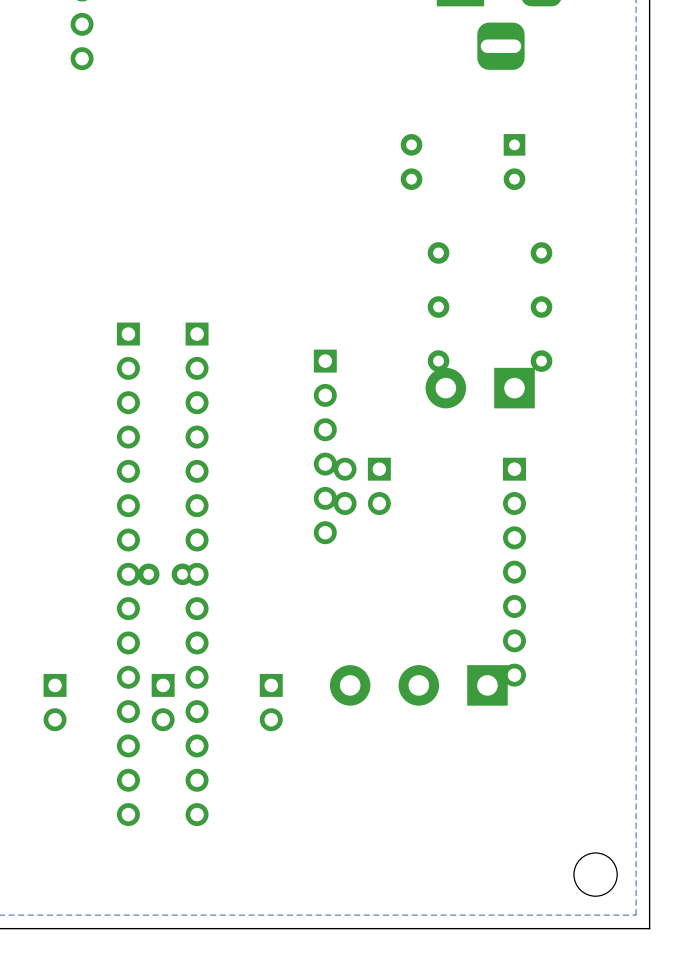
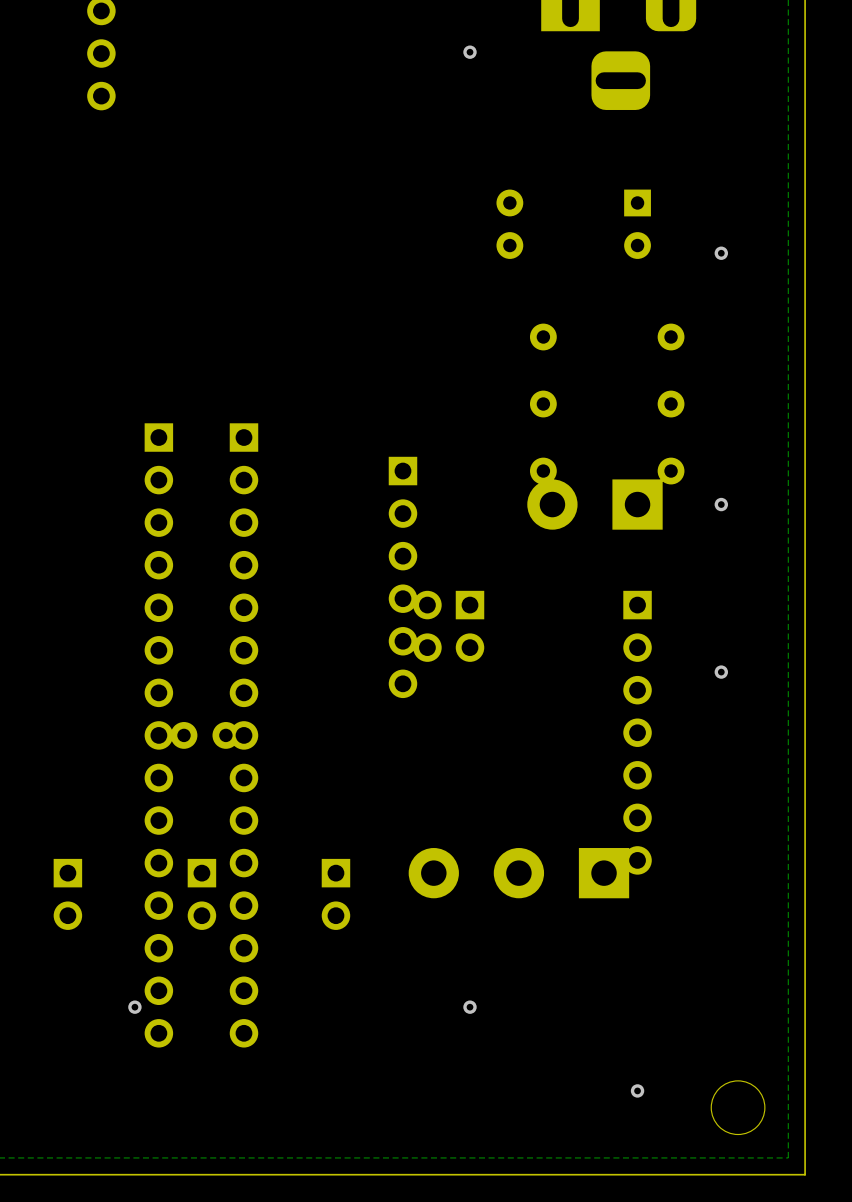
via: none -> (470, 52)
via: none -> (721, 253)
via: none -> (721, 504)
via: none -> (721, 672)
via: none -> (134, 1007)
via: none -> (470, 1007)
via: none -> (637, 1090)

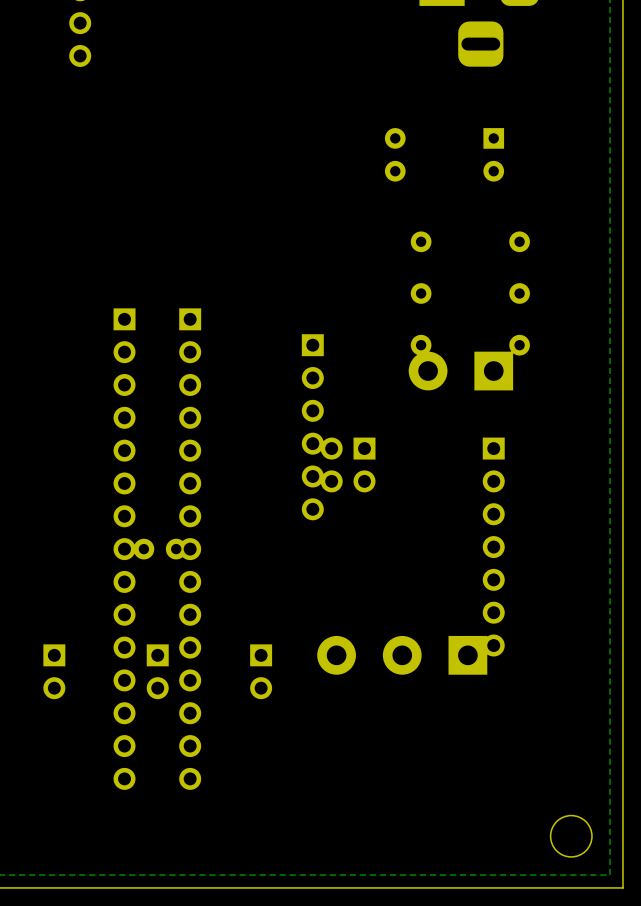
via: (470, 52) -> none
via: (721, 253) -> none
via: (721, 504) -> none
via: (721, 672) -> none
via: (134, 1007) -> none
via: (470, 1007) -> none
via: (637, 1090) -> none

